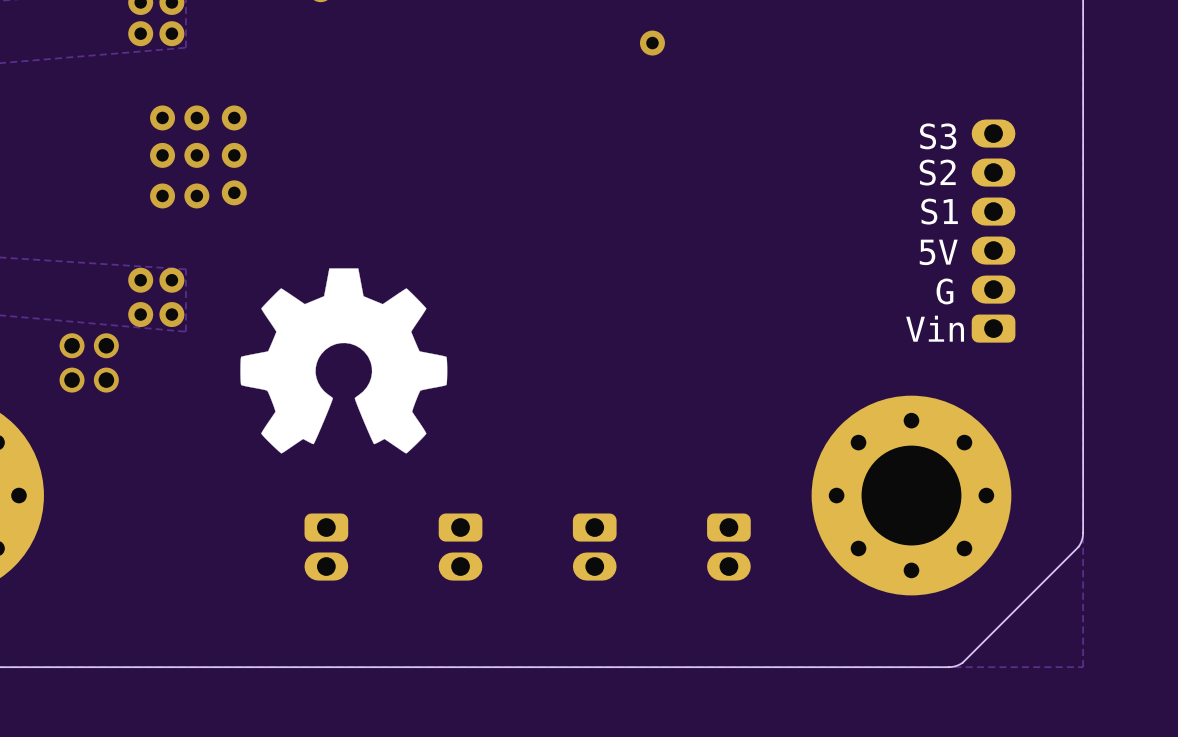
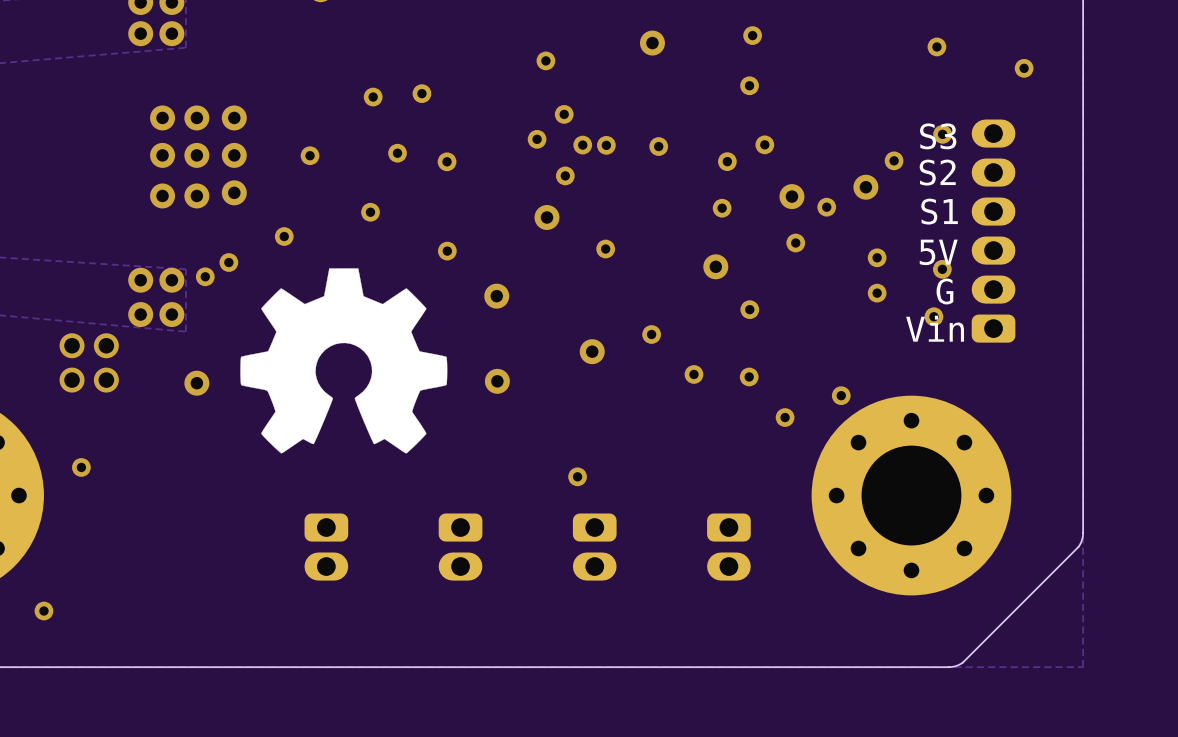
via: none -> (752, 35)
via: none -> (936, 46)
via: none -> (545, 60)
via: none -> (1024, 68)
via: none -> (749, 85)
via: none -> (421, 93)
via: none -> (373, 97)
via: none -> (564, 114)
via: none -> (942, 134)
via: none -> (537, 139)
via: none -> (764, 144)
via: none -> (582, 145)
via: none -> (606, 145)
via: none -> (658, 146)
via: none -> (397, 153)
via: none -> (310, 155)
via: none -> (894, 160)
via: none -> (447, 161)
via: none -> (727, 161)
via: none -> (565, 175)
via: none -> (865, 187)
via: none -> (791, 196)
via: none -> (826, 207)
via: none -> (722, 208)
via: none -> (370, 212)
via: none -> (546, 217)
via: none -> (284, 236)
via: none -> (795, 243)
via: none -> (605, 249)
via: none -> (447, 251)
via: none -> (877, 257)
via: none -> (228, 262)
via: none -> (715, 266)
via: none -> (942, 269)
via: none -> (205, 276)
via: none -> (877, 293)
via: none -> (496, 296)
via: none -> (749, 309)
via: none -> (933, 316)
via: none -> (651, 334)
via: none -> (592, 351)
via: none -> (693, 374)
via: none -> (749, 376)
via: none -> (497, 381)
via: none -> (196, 383)
via: none -> (841, 395)
via: none -> (785, 417)
via: none -> (81, 467)
via: none -> (577, 476)
via: none -> (43, 611)

